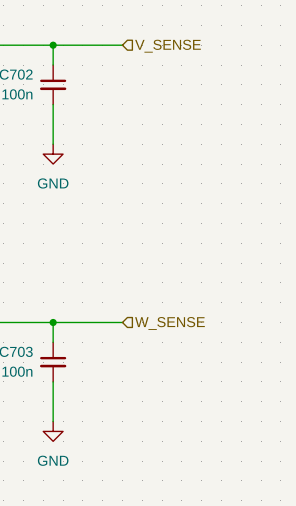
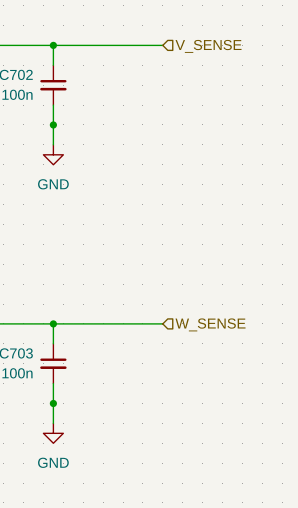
wire: none -> (123, 45) (162, 45)
hierarchical label position: V_SENSE (167, 46) -> V_SENSE (208, 46)
junction: none -> (53, 124)
wire: none -> (123, 323) (162, 323)
hierarchical label position: W_SENSE (169, 323) -> W_SENSE (210, 324)
junction: none -> (53, 403)

